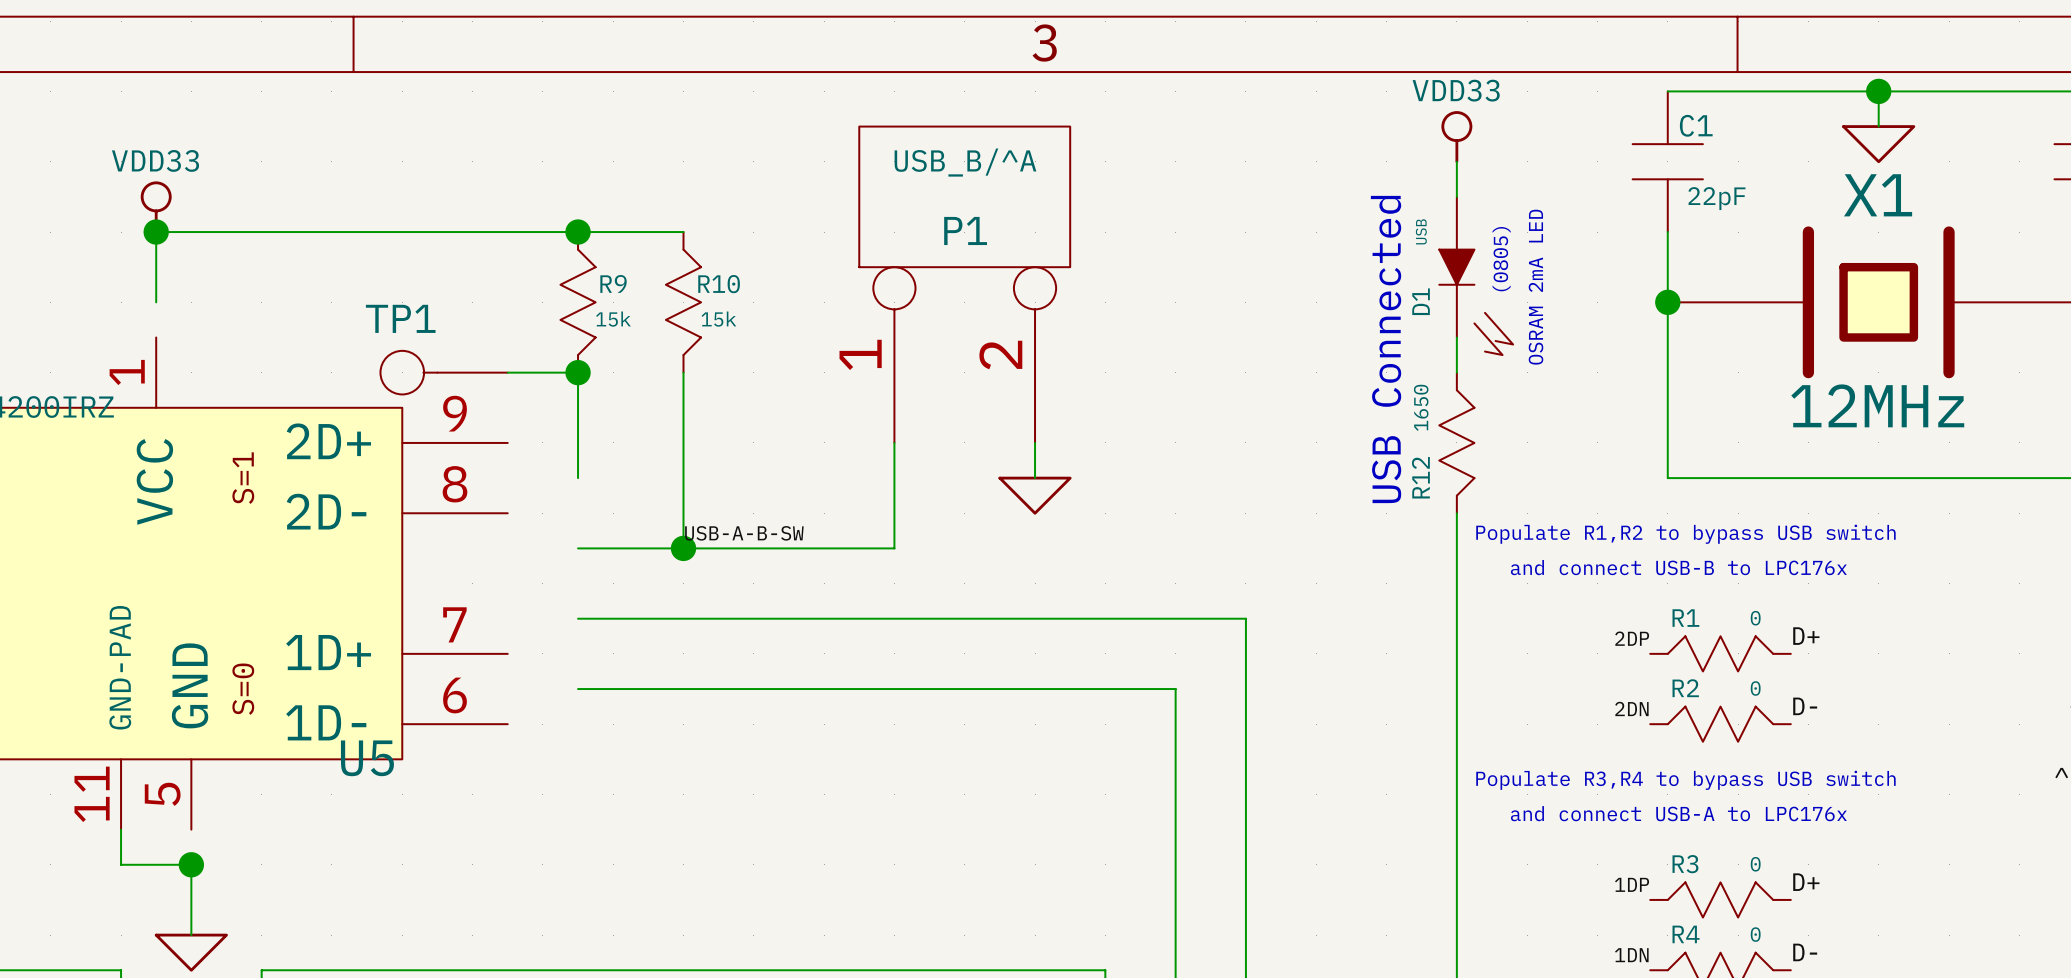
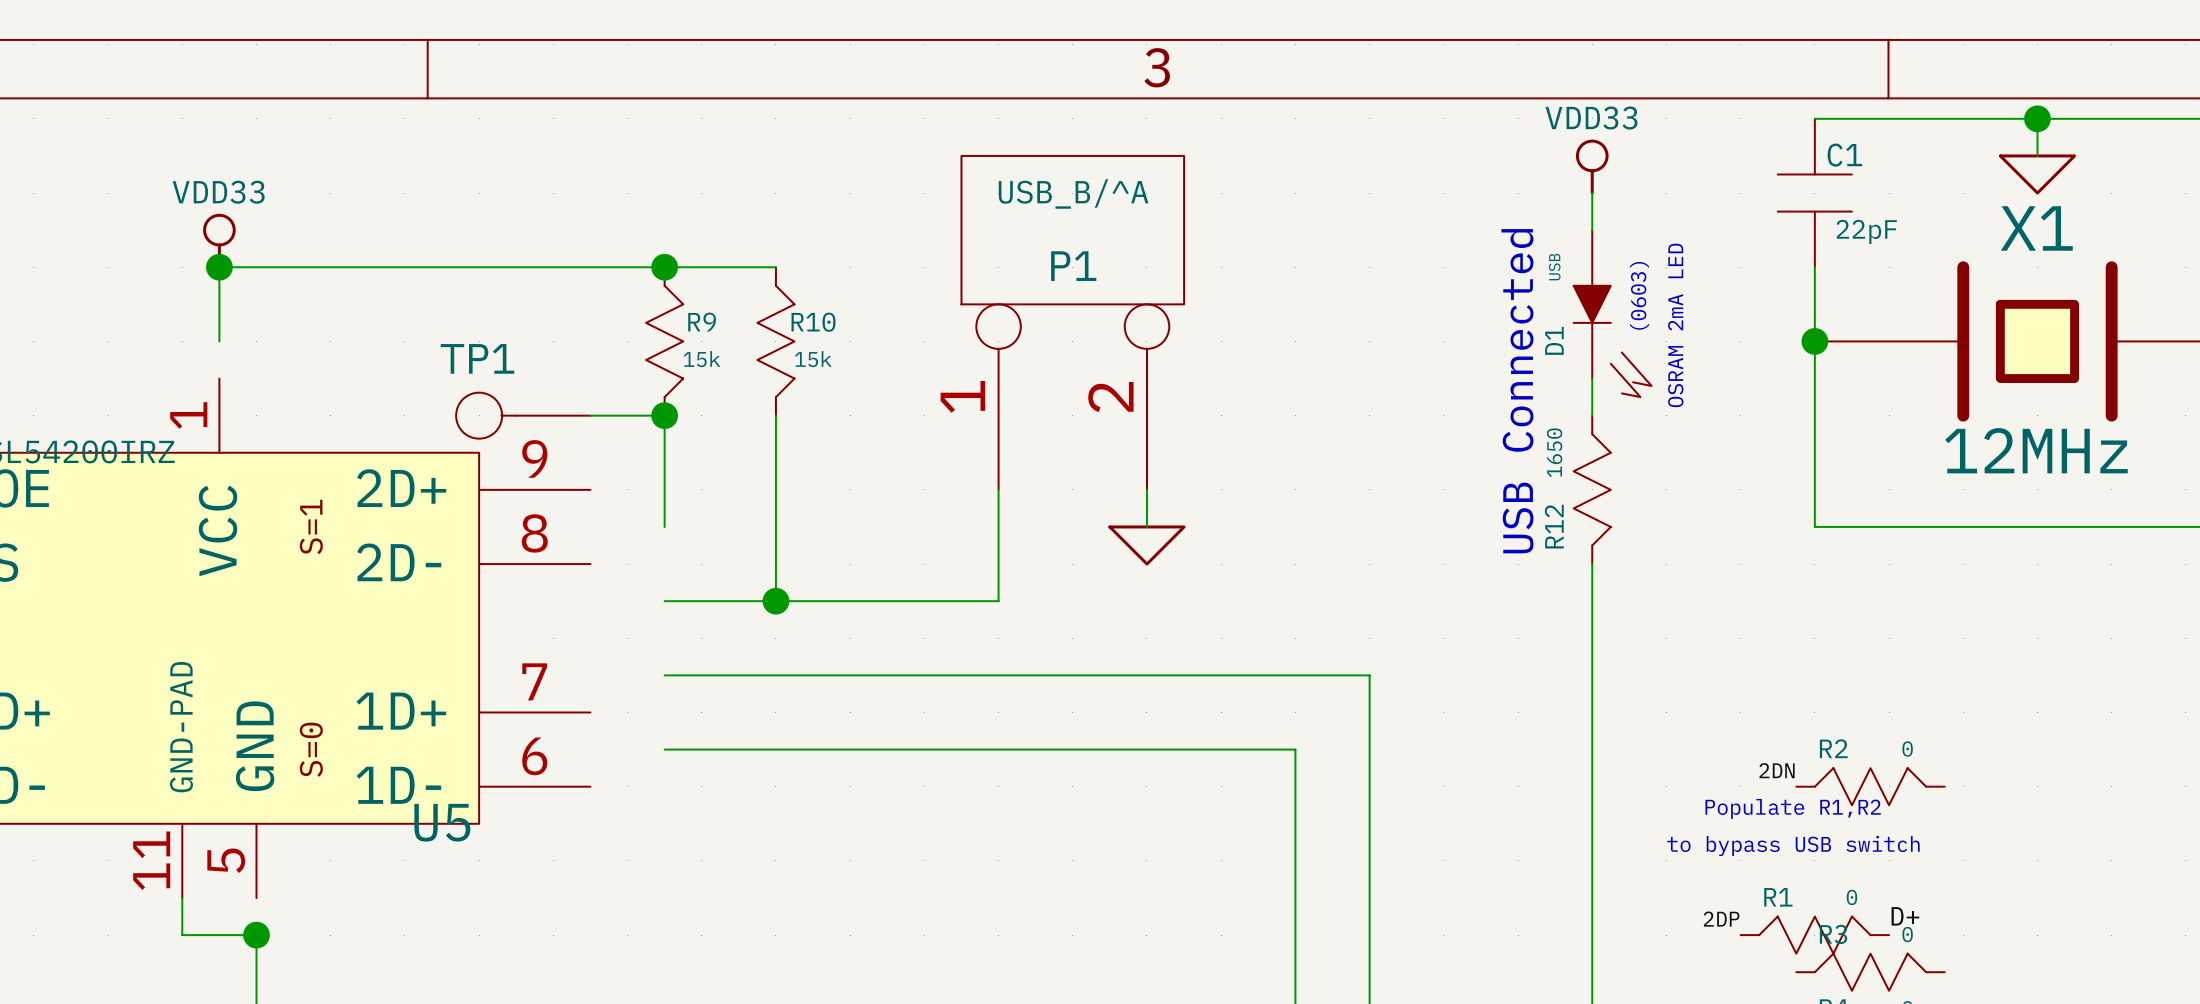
text: (0805) (1501, 259) -> (0603) (1639, 295)
label: USB-A-B-SW (744, 533) -> none
text: Populate R1,R2 to bypass USB switch (1685, 534) -> none
text: and connect USB-B to LPC176x (1678, 567) -> none
label: D+ (1806, 636) -> none
label position: 2DP (1632, 638) -> 2DP (1721, 919)
R1 position: (1720, 653) -> (1814, 935)
label: D- (1805, 706) -> none
text: none -> Populate R1,R2 (1793, 808)
text: Populate R3,R4 to bypass USB switch (1685, 780) -> to bypass USB switch (1793, 845)
text: and connect USB-A to LPC176x (1678, 813) -> none
label position: D+ (1806, 882) -> D+ (1905, 916)
label: 1DP (1632, 884) -> none

